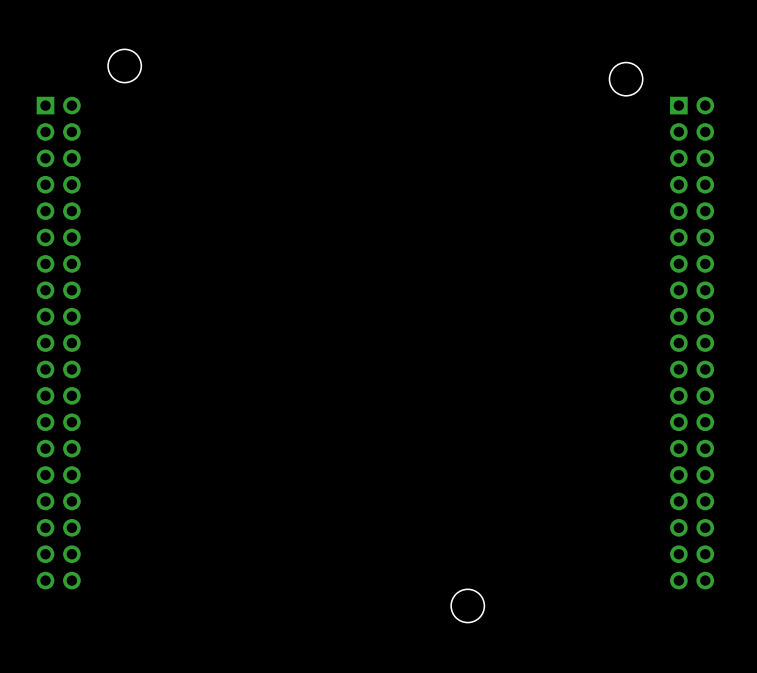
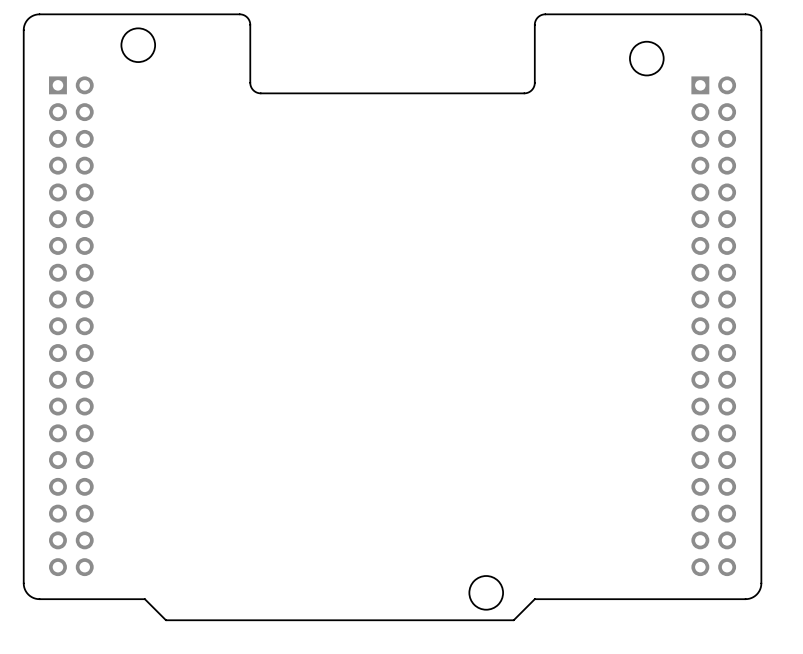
board edge: none -> (39, 14) (243, 14) (247, 18) (250, 23) (250, 85) (254, 91) (260, 93) (525, 93) (531, 90) (534, 85) (534, 23) (537, 18) (541, 14) (745, 14) (755, 17) (759, 22) (761, 30) (761, 583) (758, 593) (751, 597) (745, 599) (534, 599) (513, 620) (165, 620) (144, 599) (39, 599) (29, 595) (25, 591) (23, 583) (23, 30) (28, 18) (39, 14)

